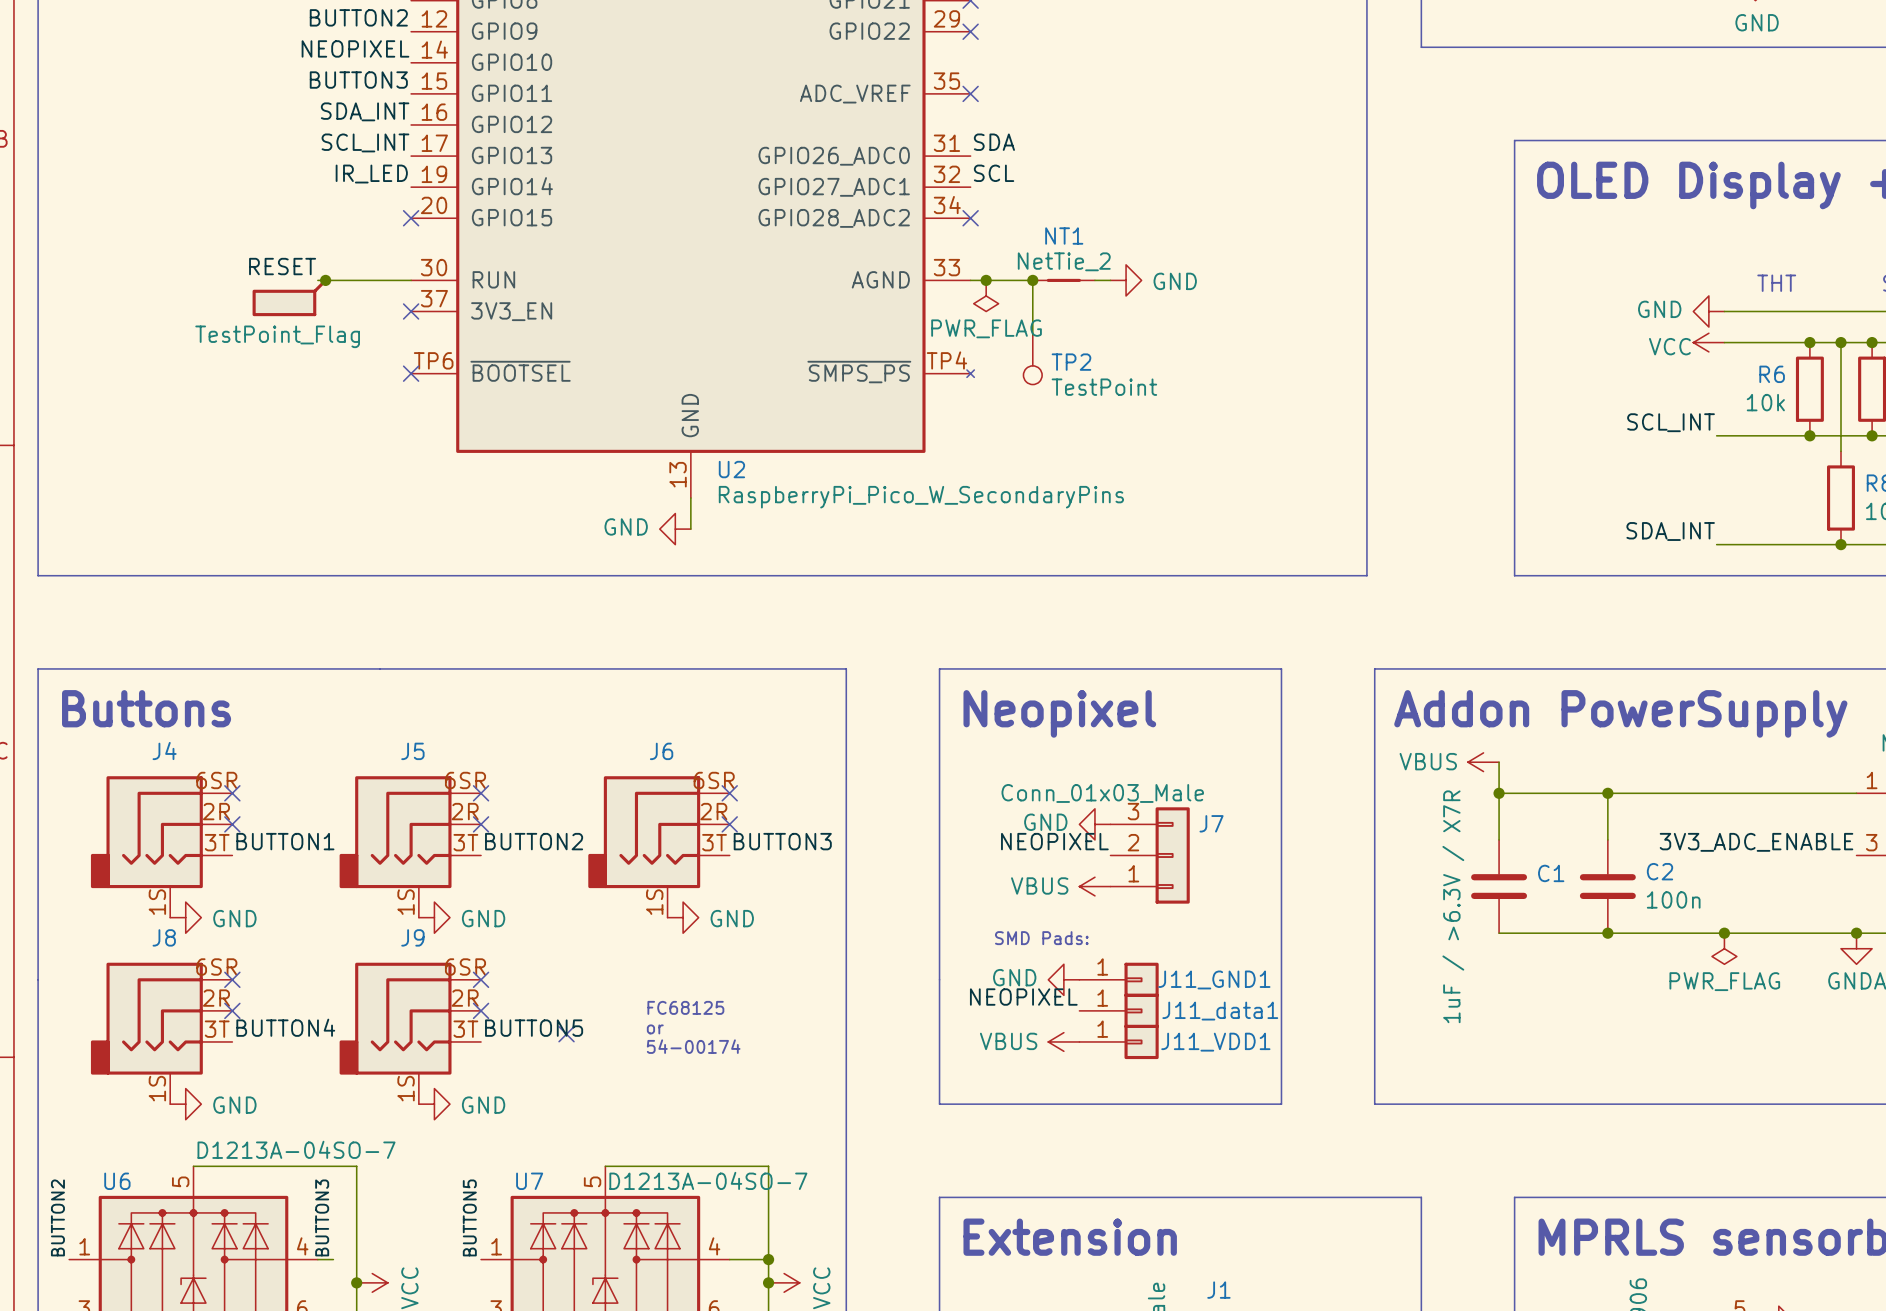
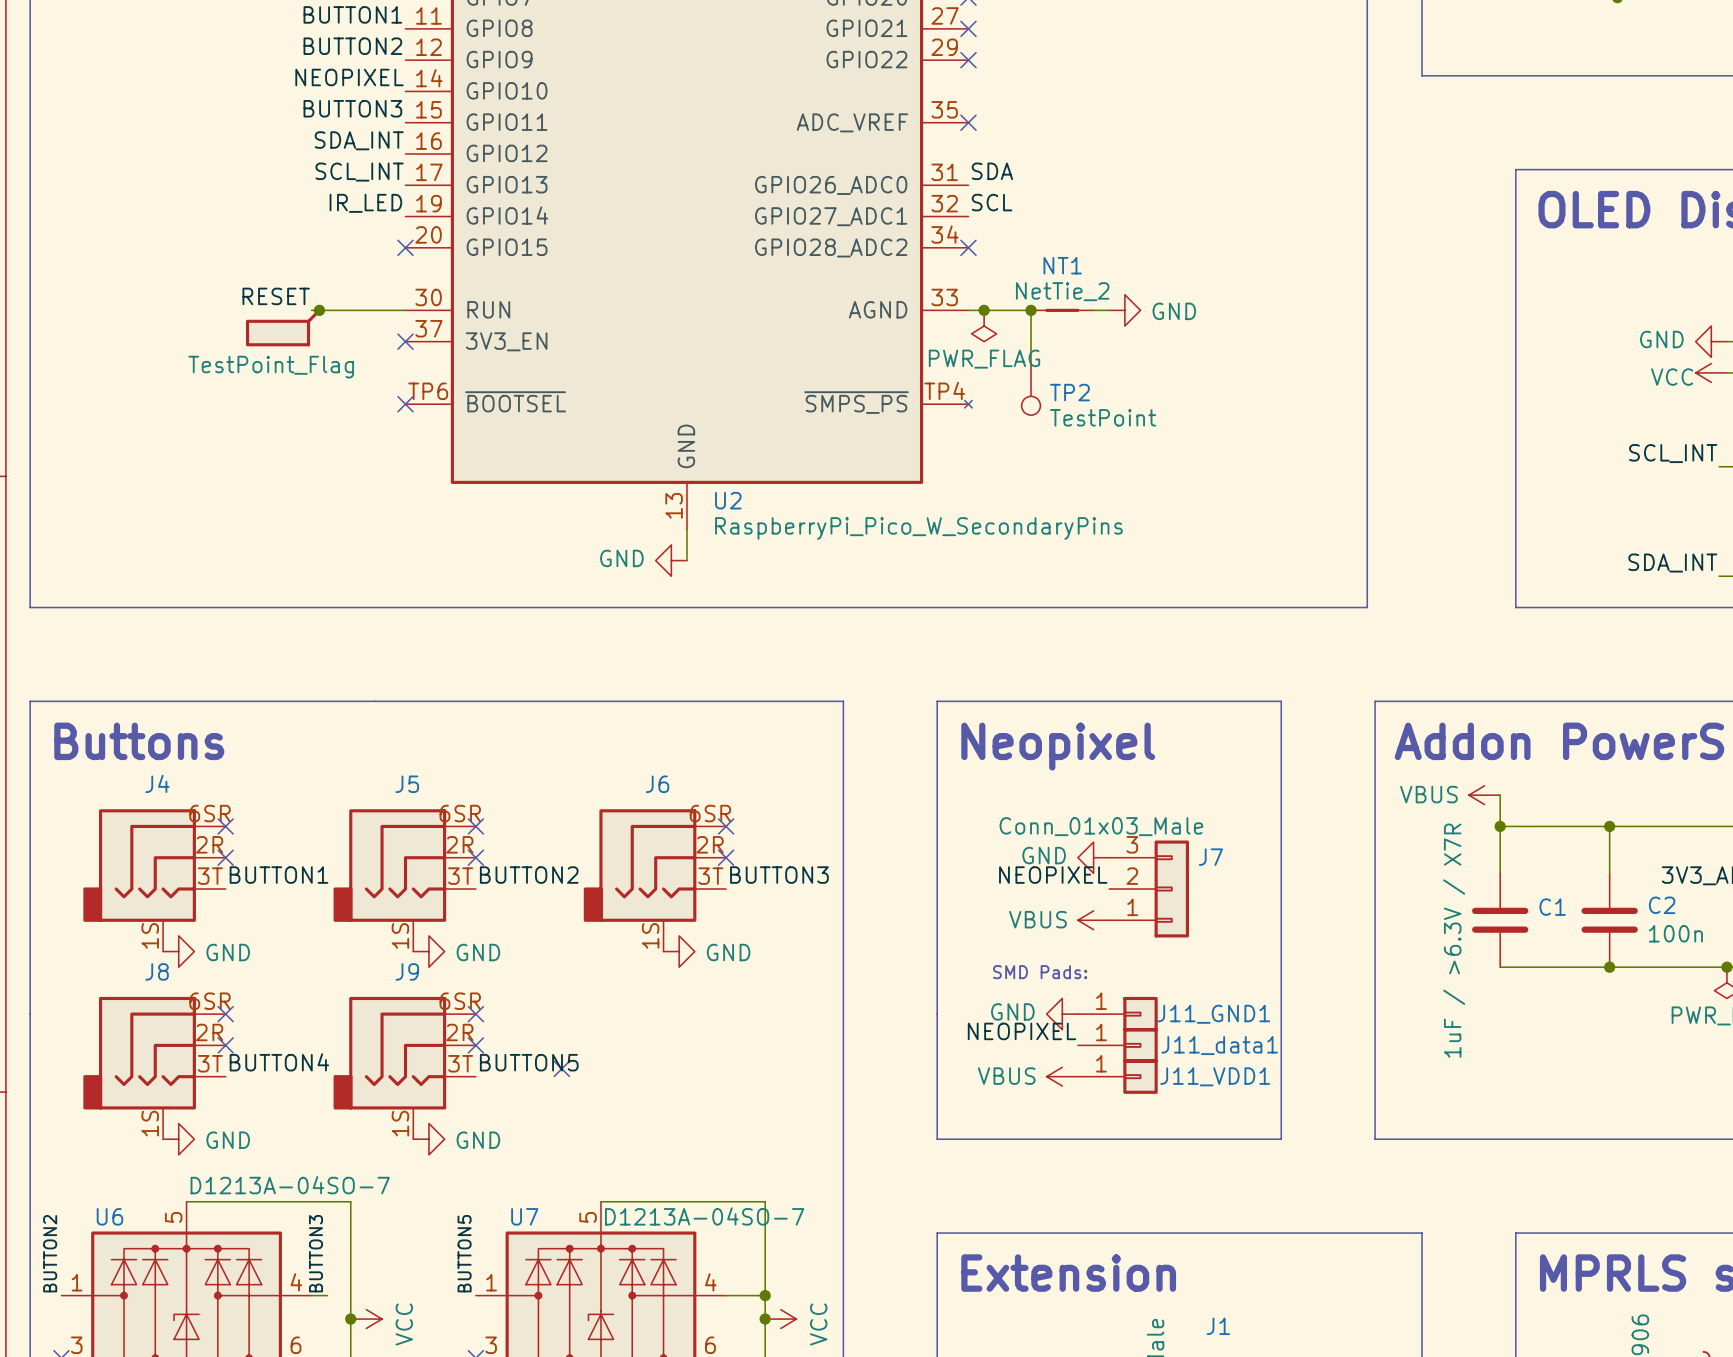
text: FC68125 (685, 1007) -> none
text: or (655, 1029) -> none
text: 54-00174 (693, 1046) -> none

